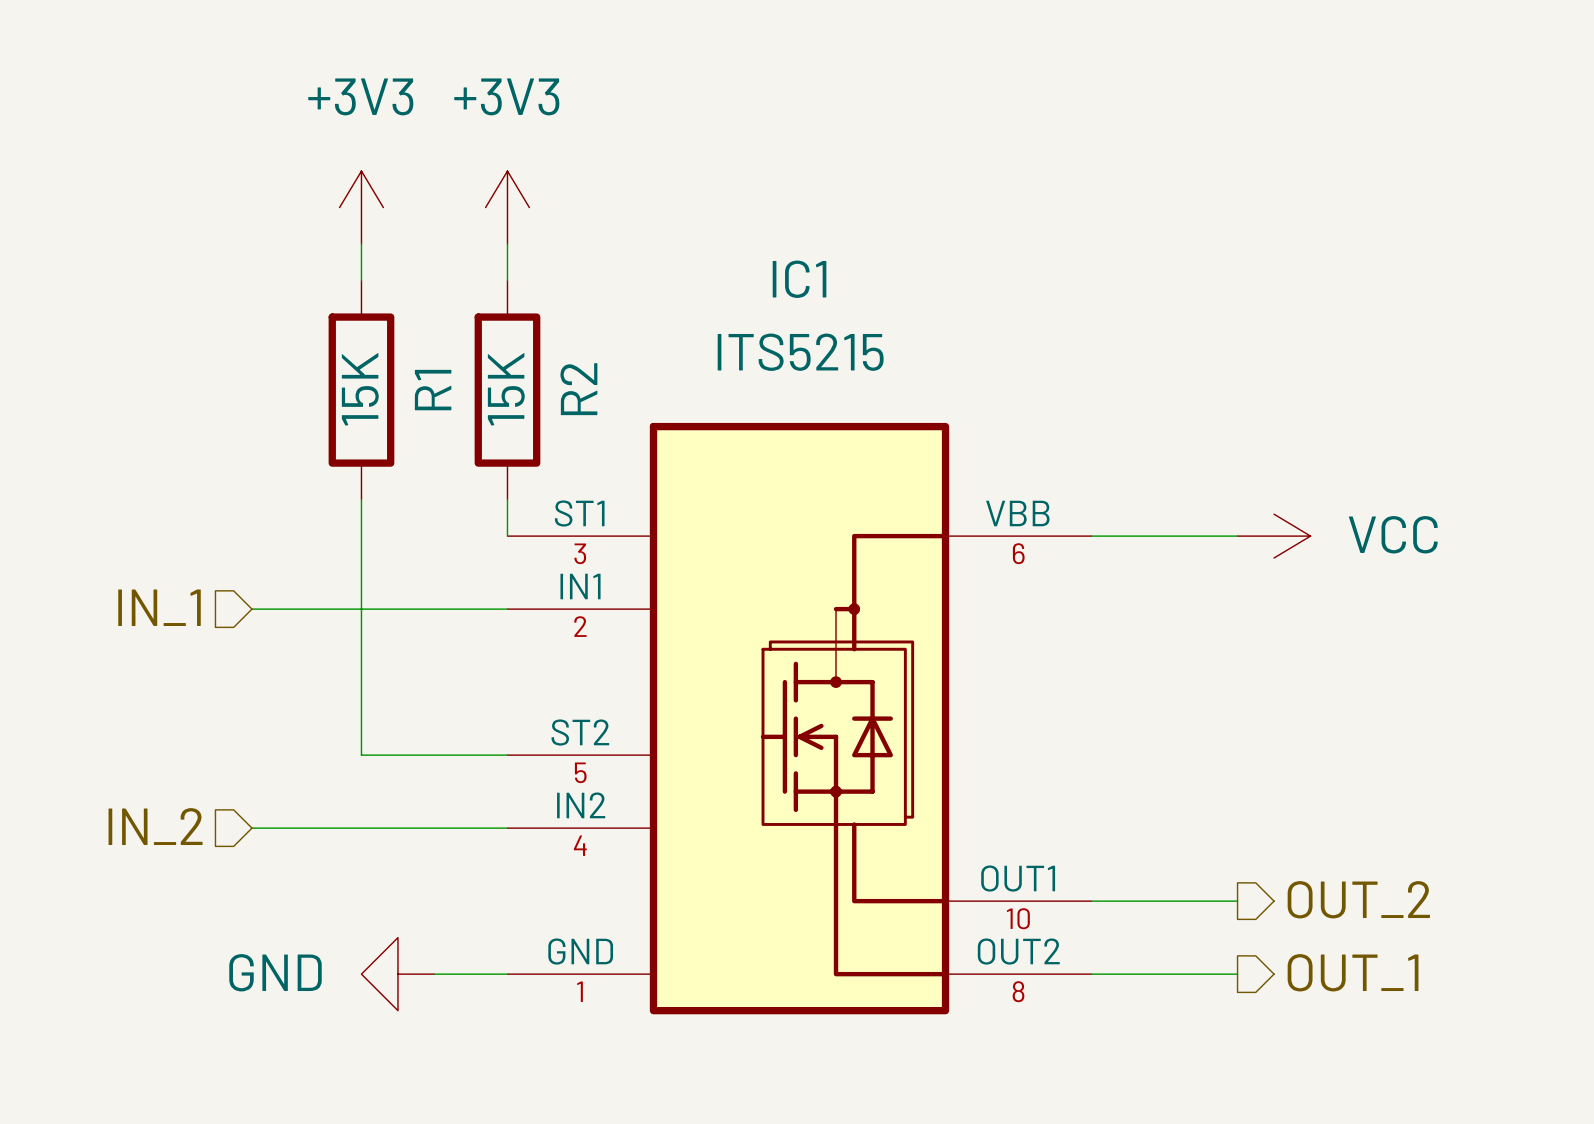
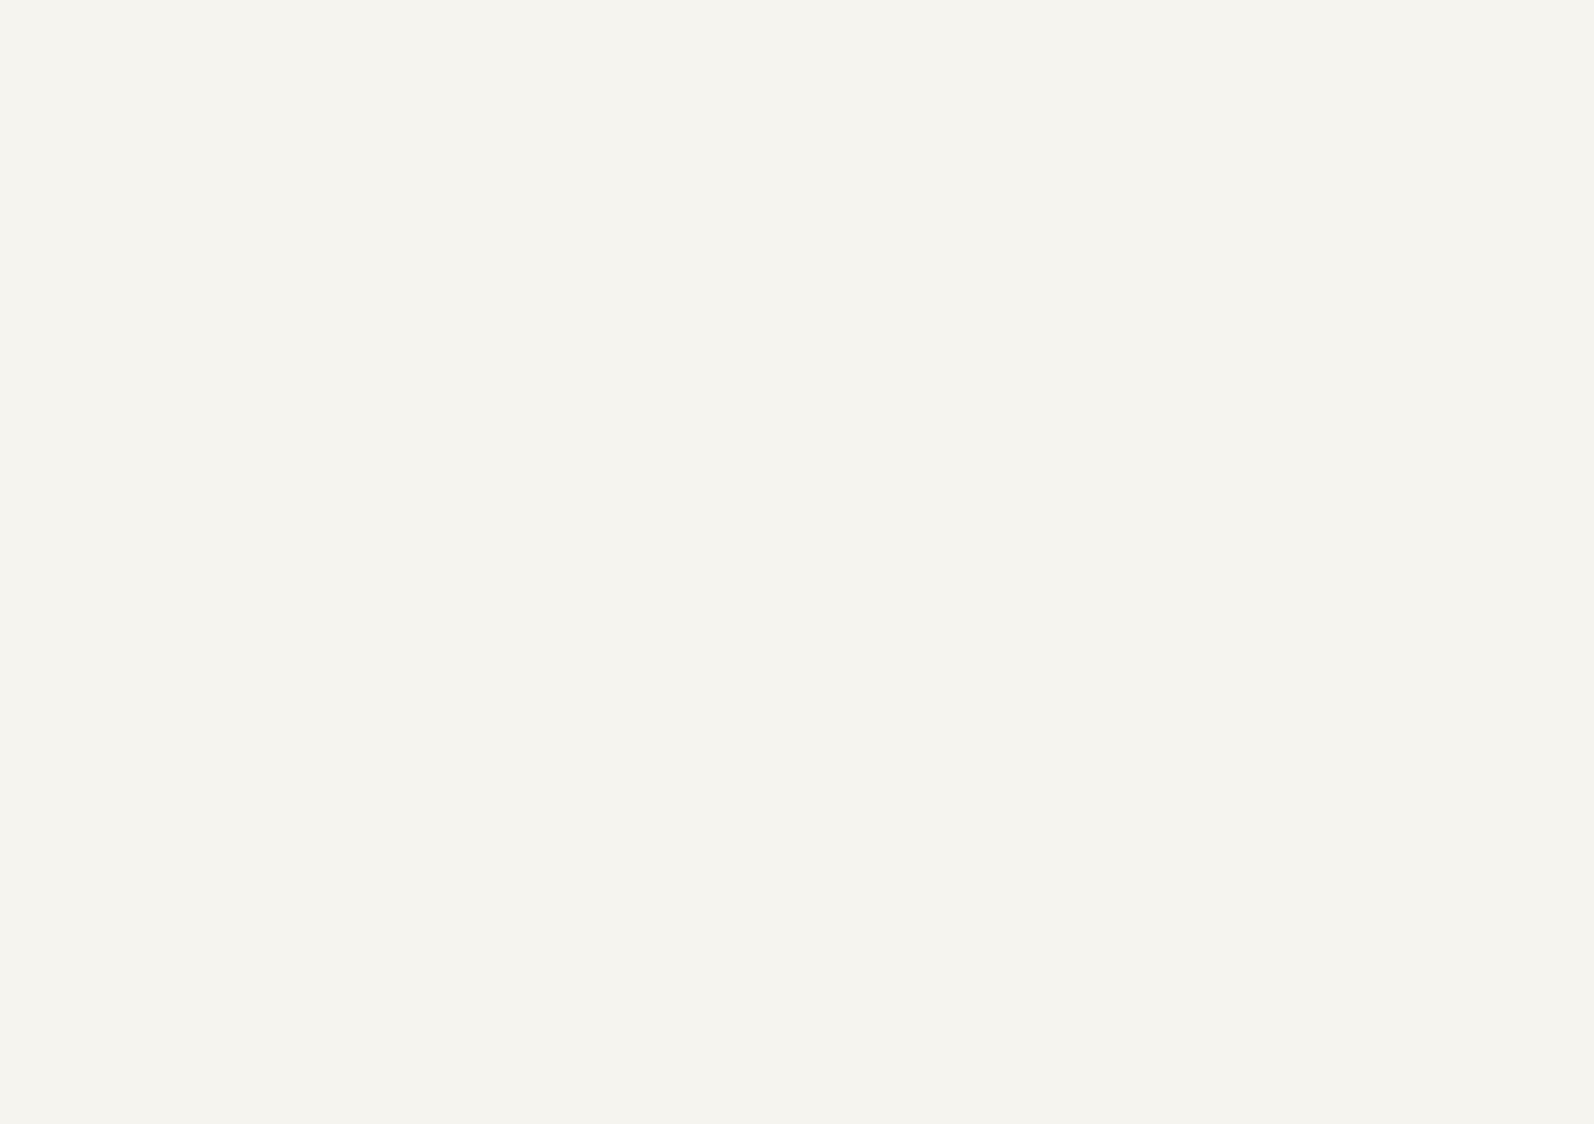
power symbol: +3V3 (361, 207) -> none
power symbol: +3V3 (507, 207) -> none
wire: (361, 244) (361, 280) -> none
wire: (507, 244) (507, 280) -> none
R1: 15K (361, 390) -> none
R2: 15K (507, 390) -> none
wire: (361, 499) (361, 755) (507, 755) -> none
wire: (507, 499) (507, 536) -> none
wire: (1091, 536) (1237, 536) -> none
power symbol: VCC (1274, 536) -> none
hierarchical label: IN_1 (159, 607) -> none
wire: (251, 609) (507, 609) -> none
IC1: ITS5215 (799, 718) -> none
hierarchical label: IN_2 (155, 826) -> none
wire: (251, 828) (507, 828) -> none
hierarchical label: OUT_2 (1358, 899) -> none
wire: (1091, 901) (1237, 901) -> none
hierarchical label: OUT_1 (1353, 972) -> none
power symbol: GND (397, 974) -> none
wire: (434, 974) (507, 974) -> none
wire: (1091, 974) (1237, 974) -> none

